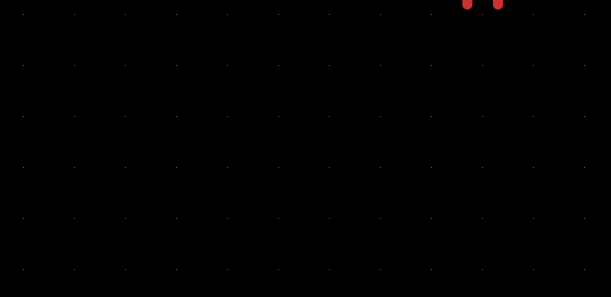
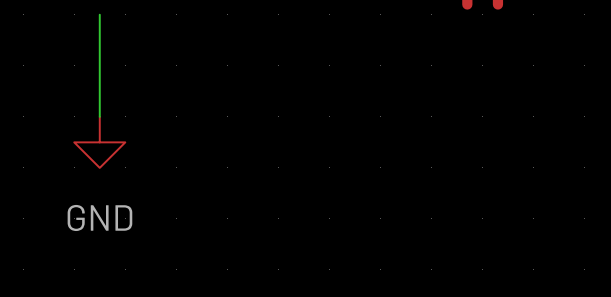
wire: none -> (99, 14) (99, 116)
power symbol: none -> GND (99, 142)

